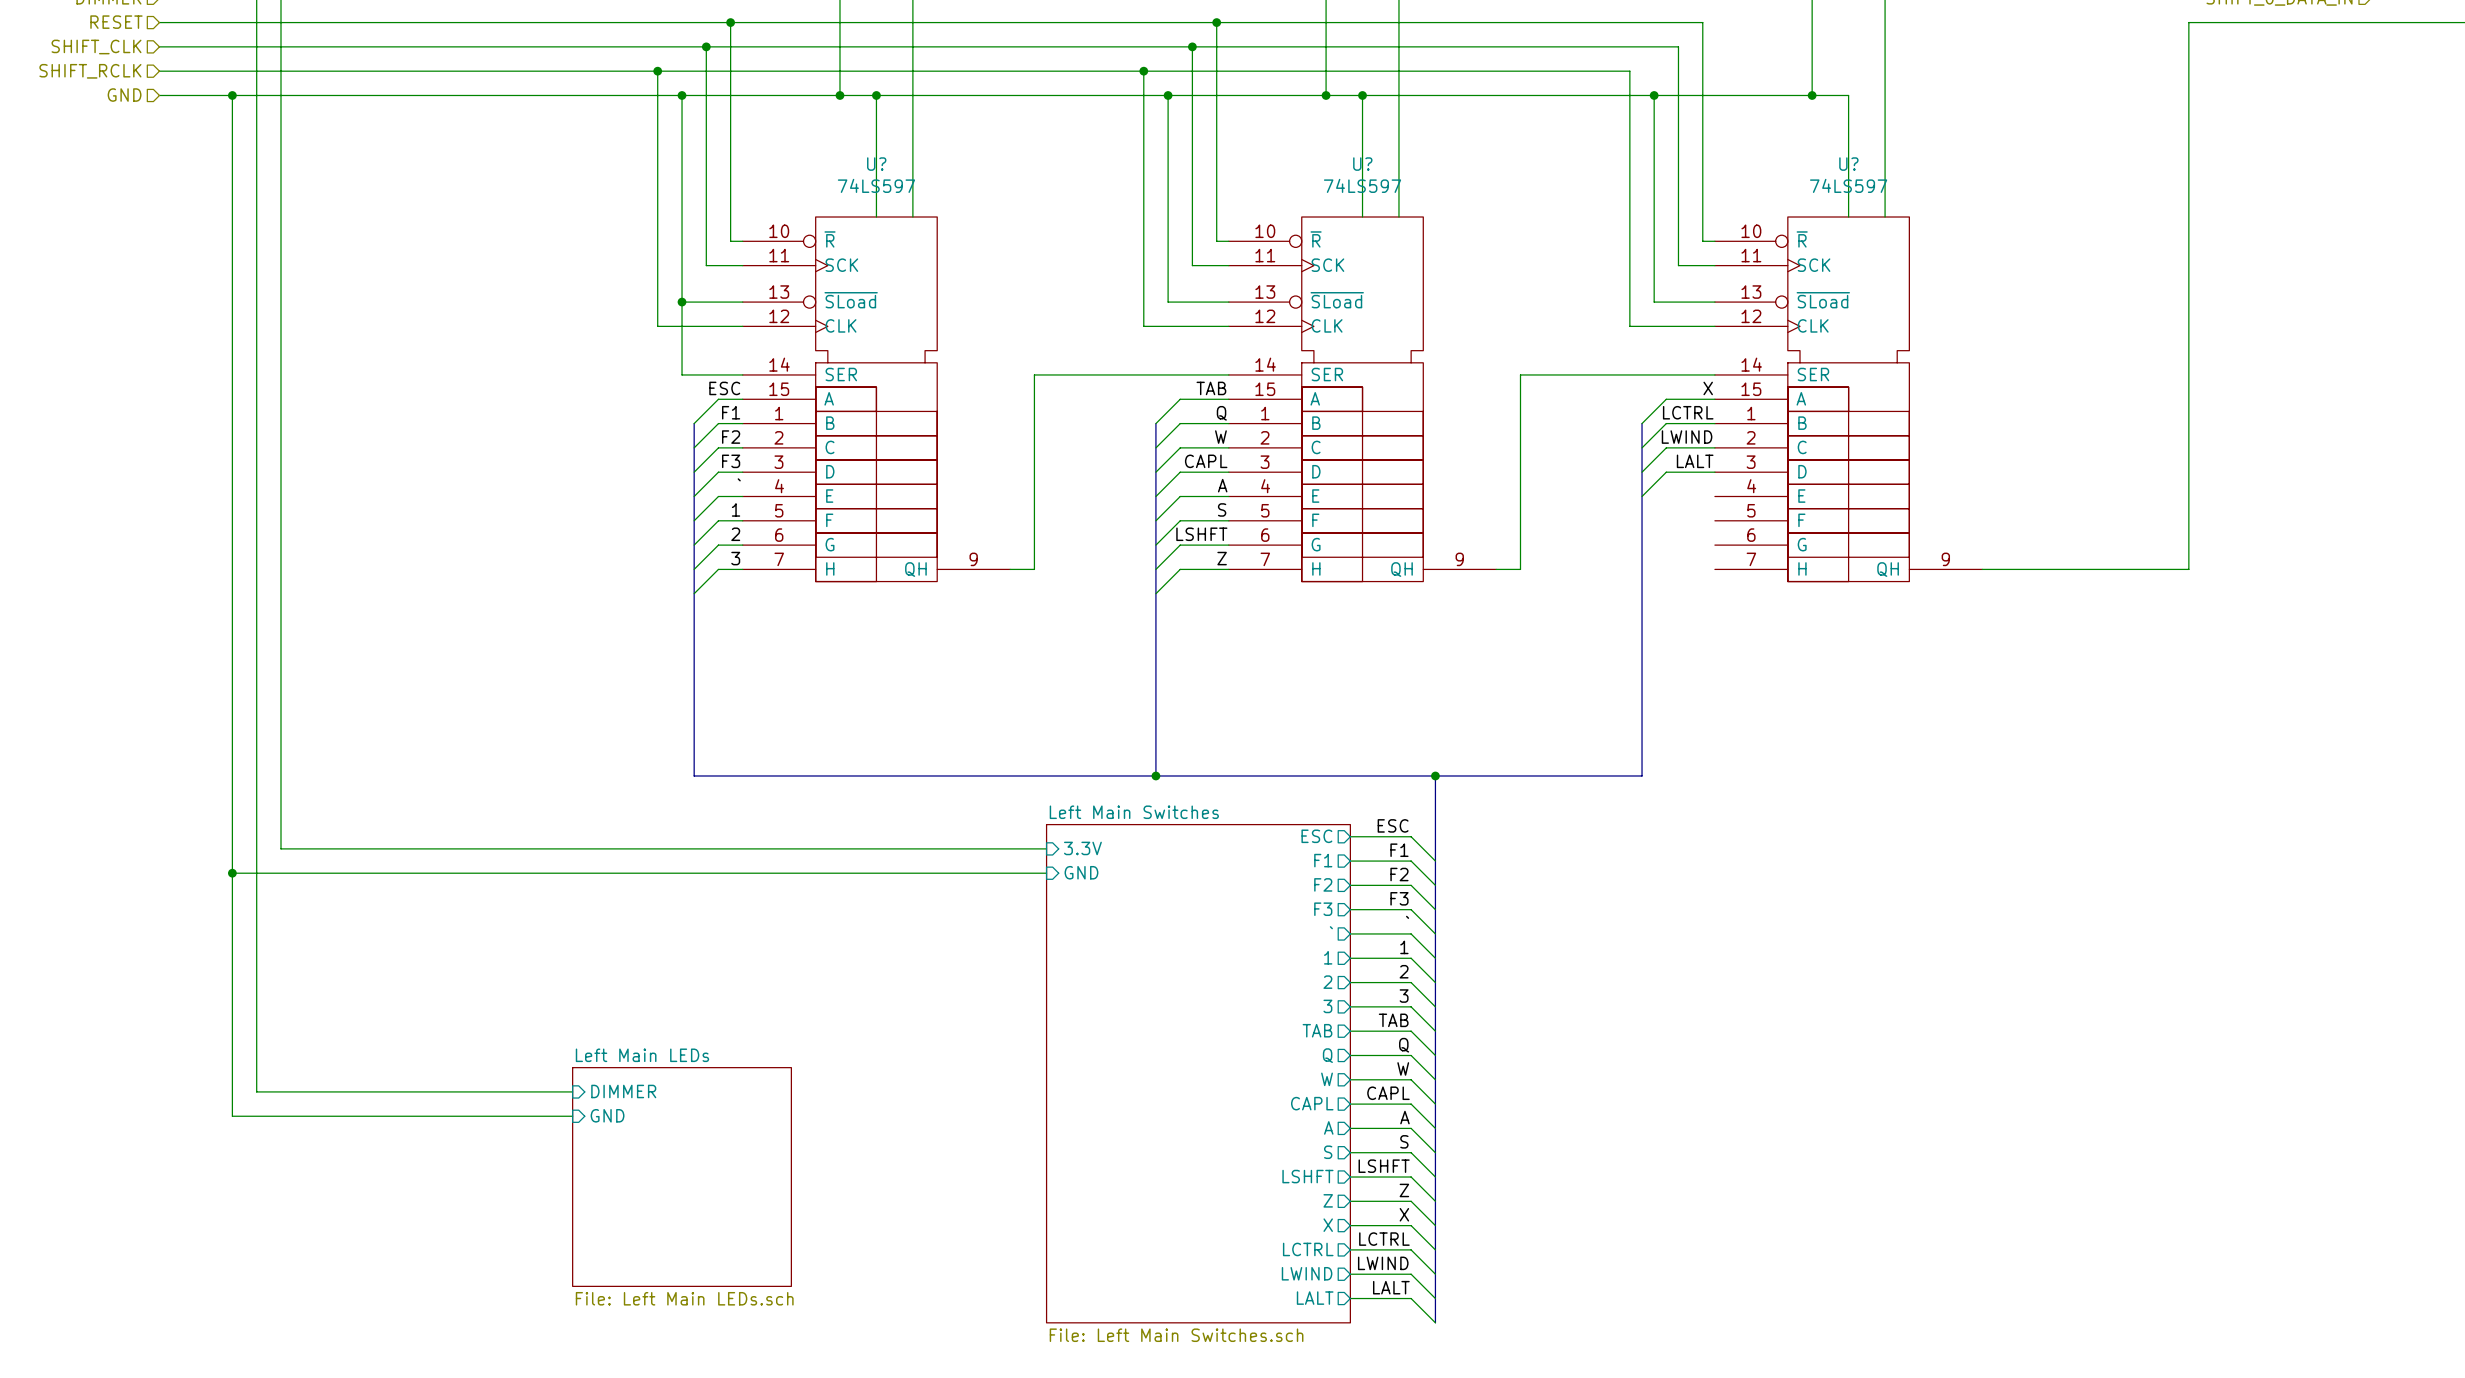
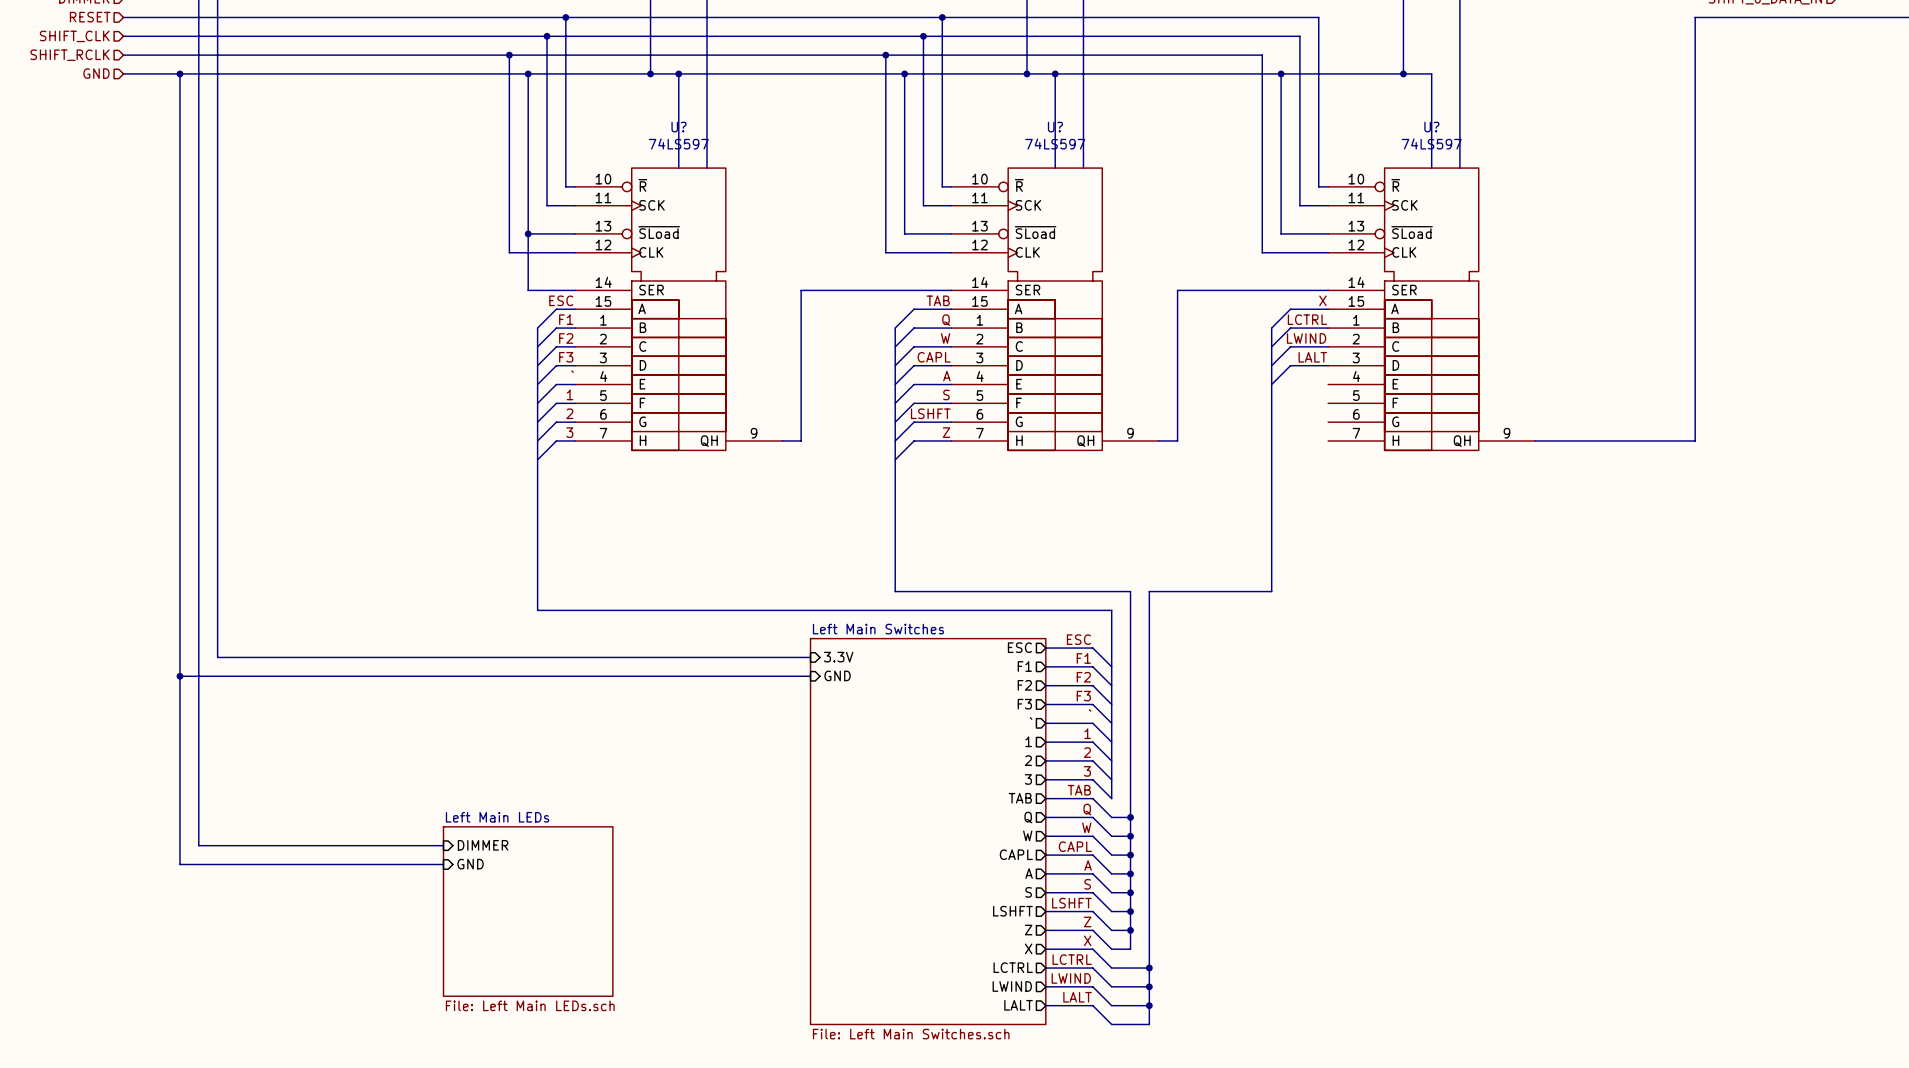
bus: (1155, 763) (1155, 775) -> (895, 591) (1130, 591) (1130, 949) (1111, 949)
bus: (1642, 763) (1642, 775) (694, 775) -> (1111, 610) (537, 610) (537, 600)
junction: (1155, 775) -> none
bus: (1435, 775) (1435, 788) -> none
junction: (1435, 775) -> none
bus: (1435, 1031) (1435, 1322) -> (1271, 591) (1149, 591) (1149, 1024) (1111, 1024)
bus: none -> (1111, 817) (1130, 817)
junction: none -> (1130, 817)
bus: none -> (1111, 836) (1130, 836)
junction: none -> (1130, 836)
bus: none -> (1111, 855) (1130, 855)
junction: none -> (1130, 855)
bus: none -> (1111, 873) (1130, 873)
junction: none -> (1130, 873)
bus: none -> (1111, 892) (1130, 892)
junction: none -> (1130, 892)
bus: none -> (1111, 911) (1130, 911)
junction: none -> (1130, 911)
bus: none -> (1111, 930) (1130, 930)
junction: none -> (1130, 930)
bus: none -> (1111, 968) (1149, 968)
junction: none -> (1149, 968)
bus: none -> (1111, 986) (1149, 986)
junction: none -> (1149, 986)
bus: none -> (1111, 1005) (1149, 1005)
junction: none -> (1149, 1005)

